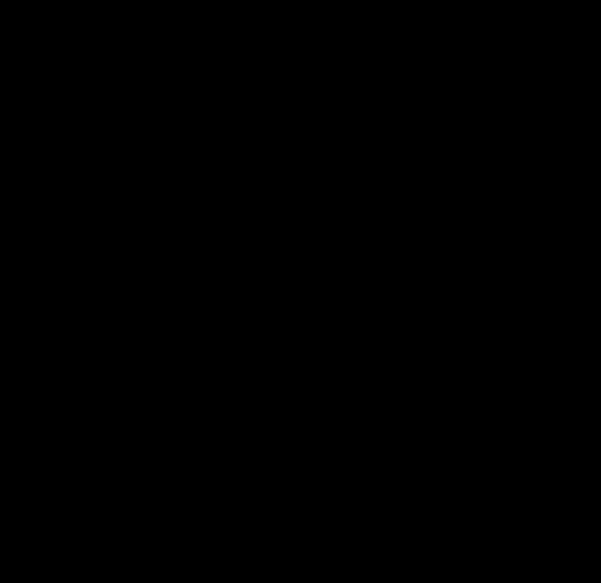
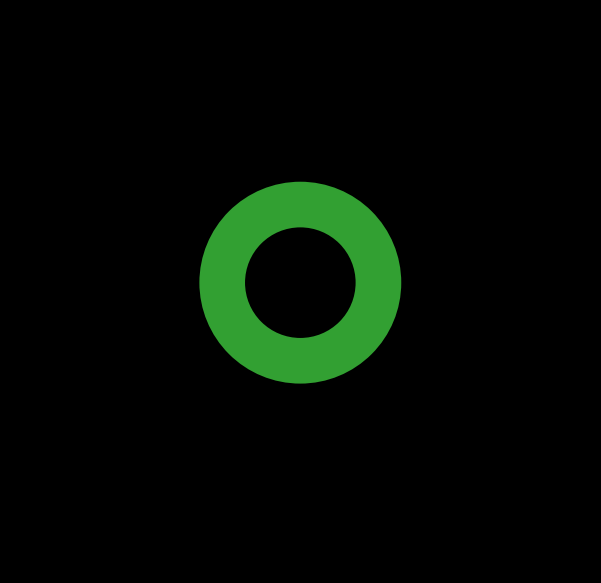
part: none -> (300, 282)

